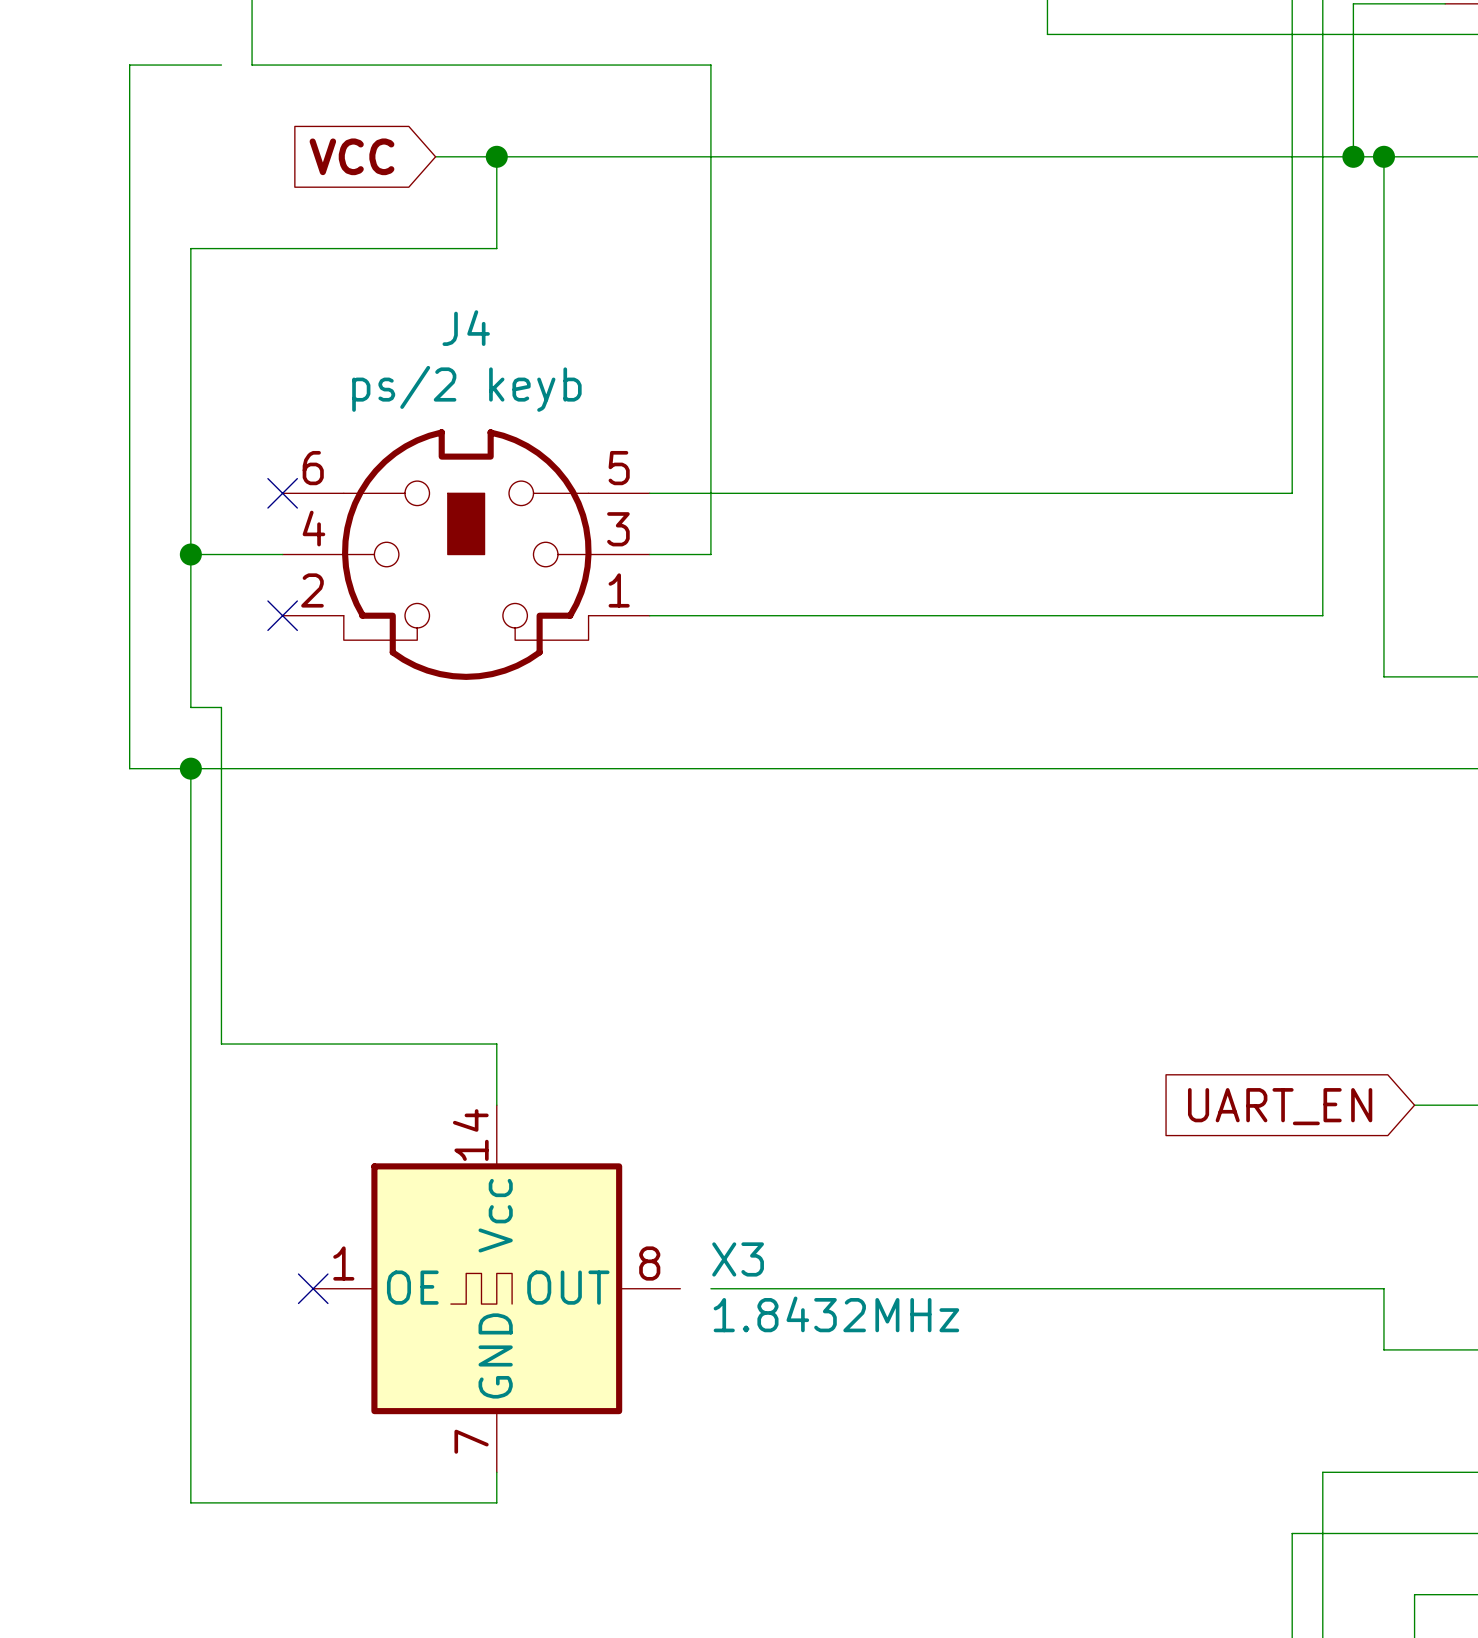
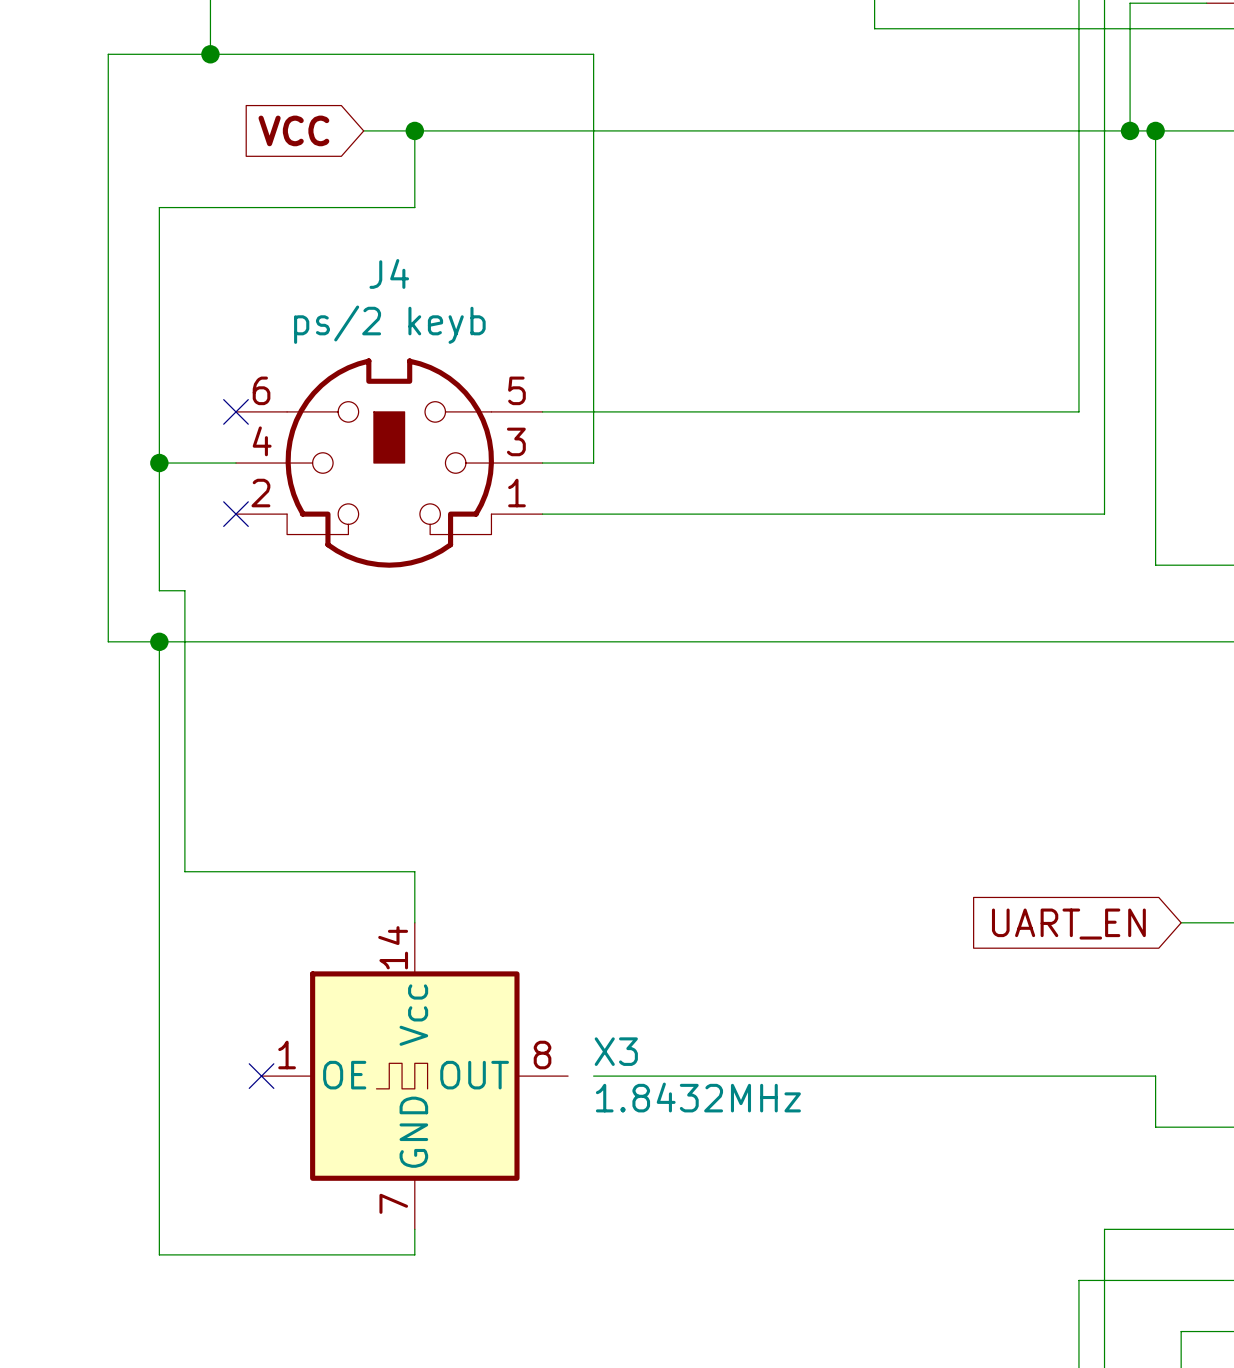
wire: none -> (184, 54) (210, 54)
junction: none -> (210, 54)

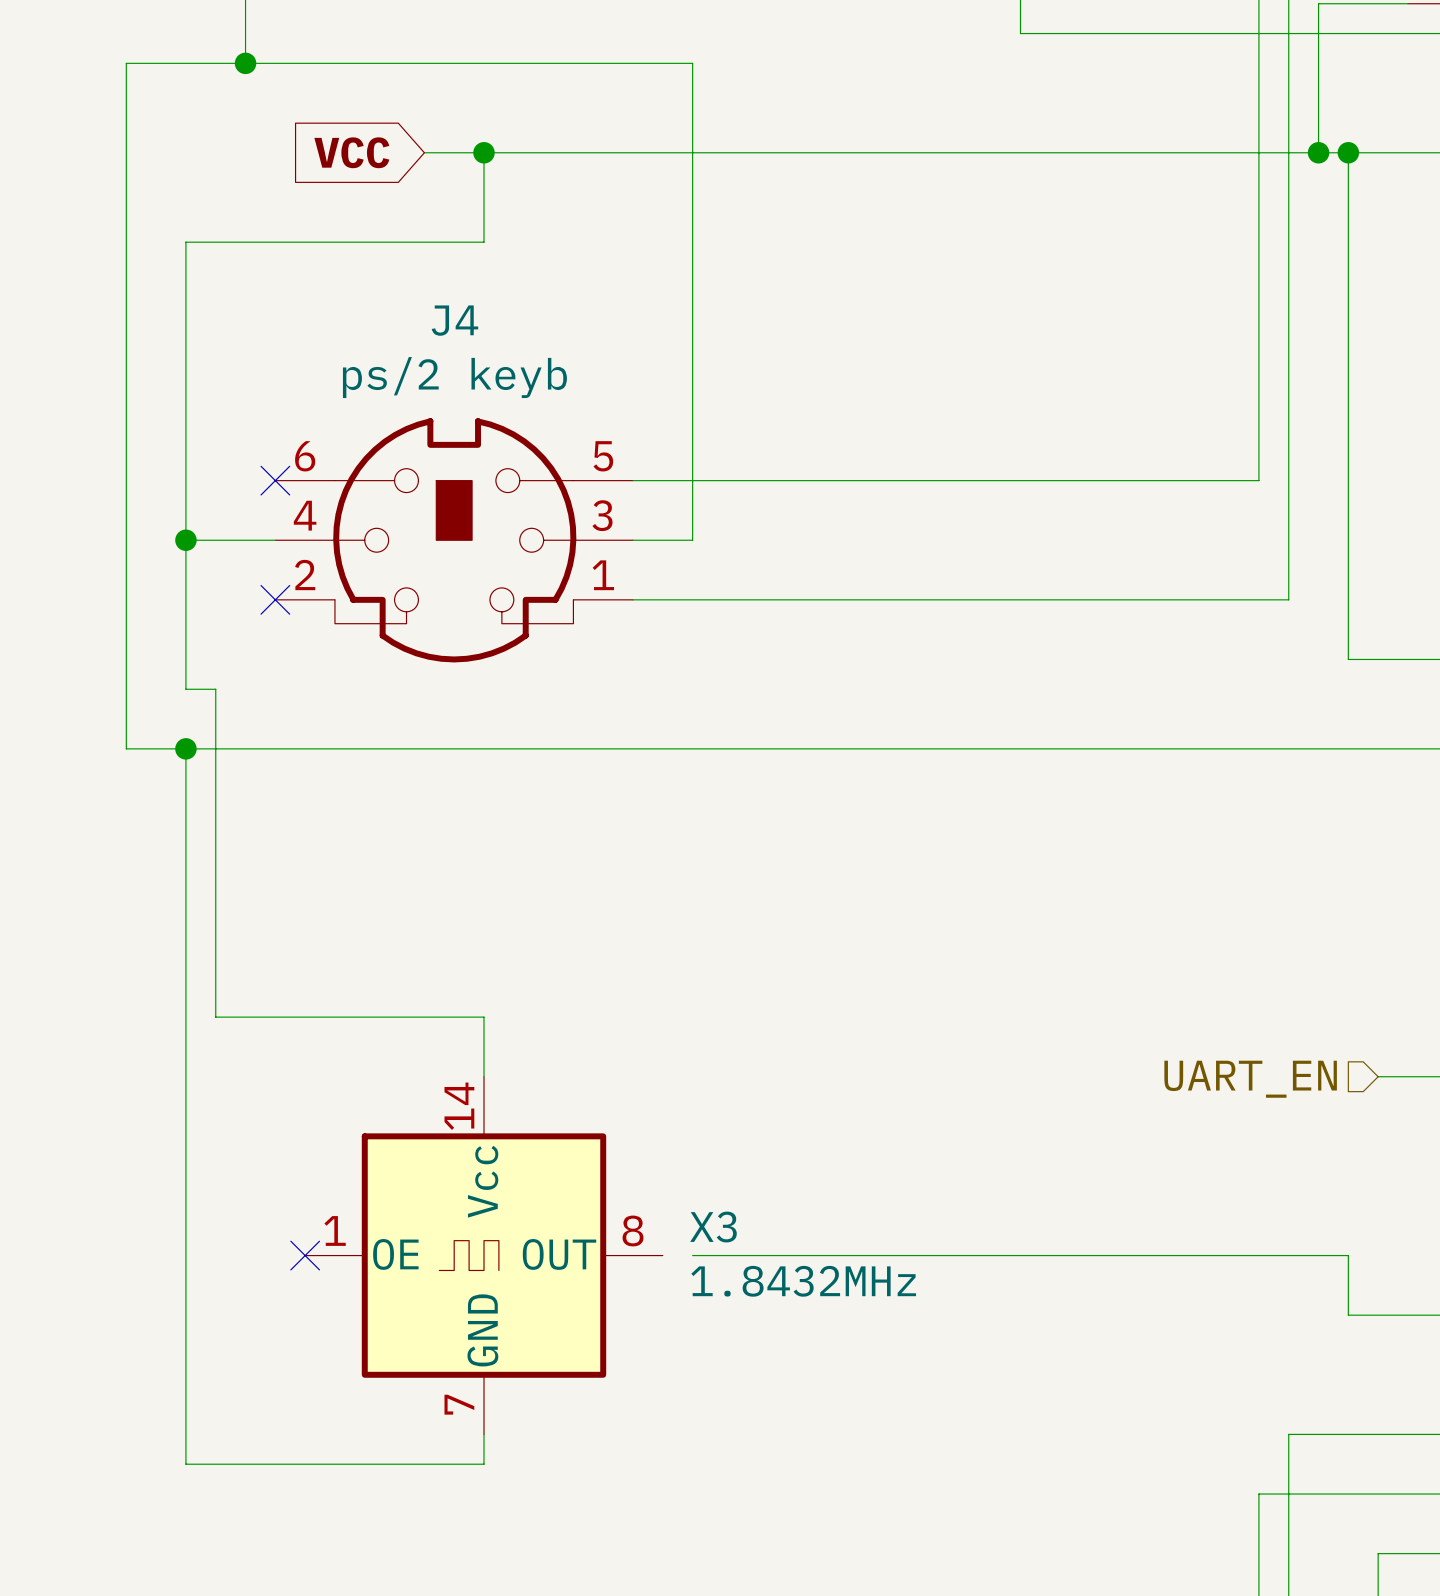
hierarchical label: none -> UART_EN (1250, 1079)
global label: UART_EN (1068, 924) -> none

